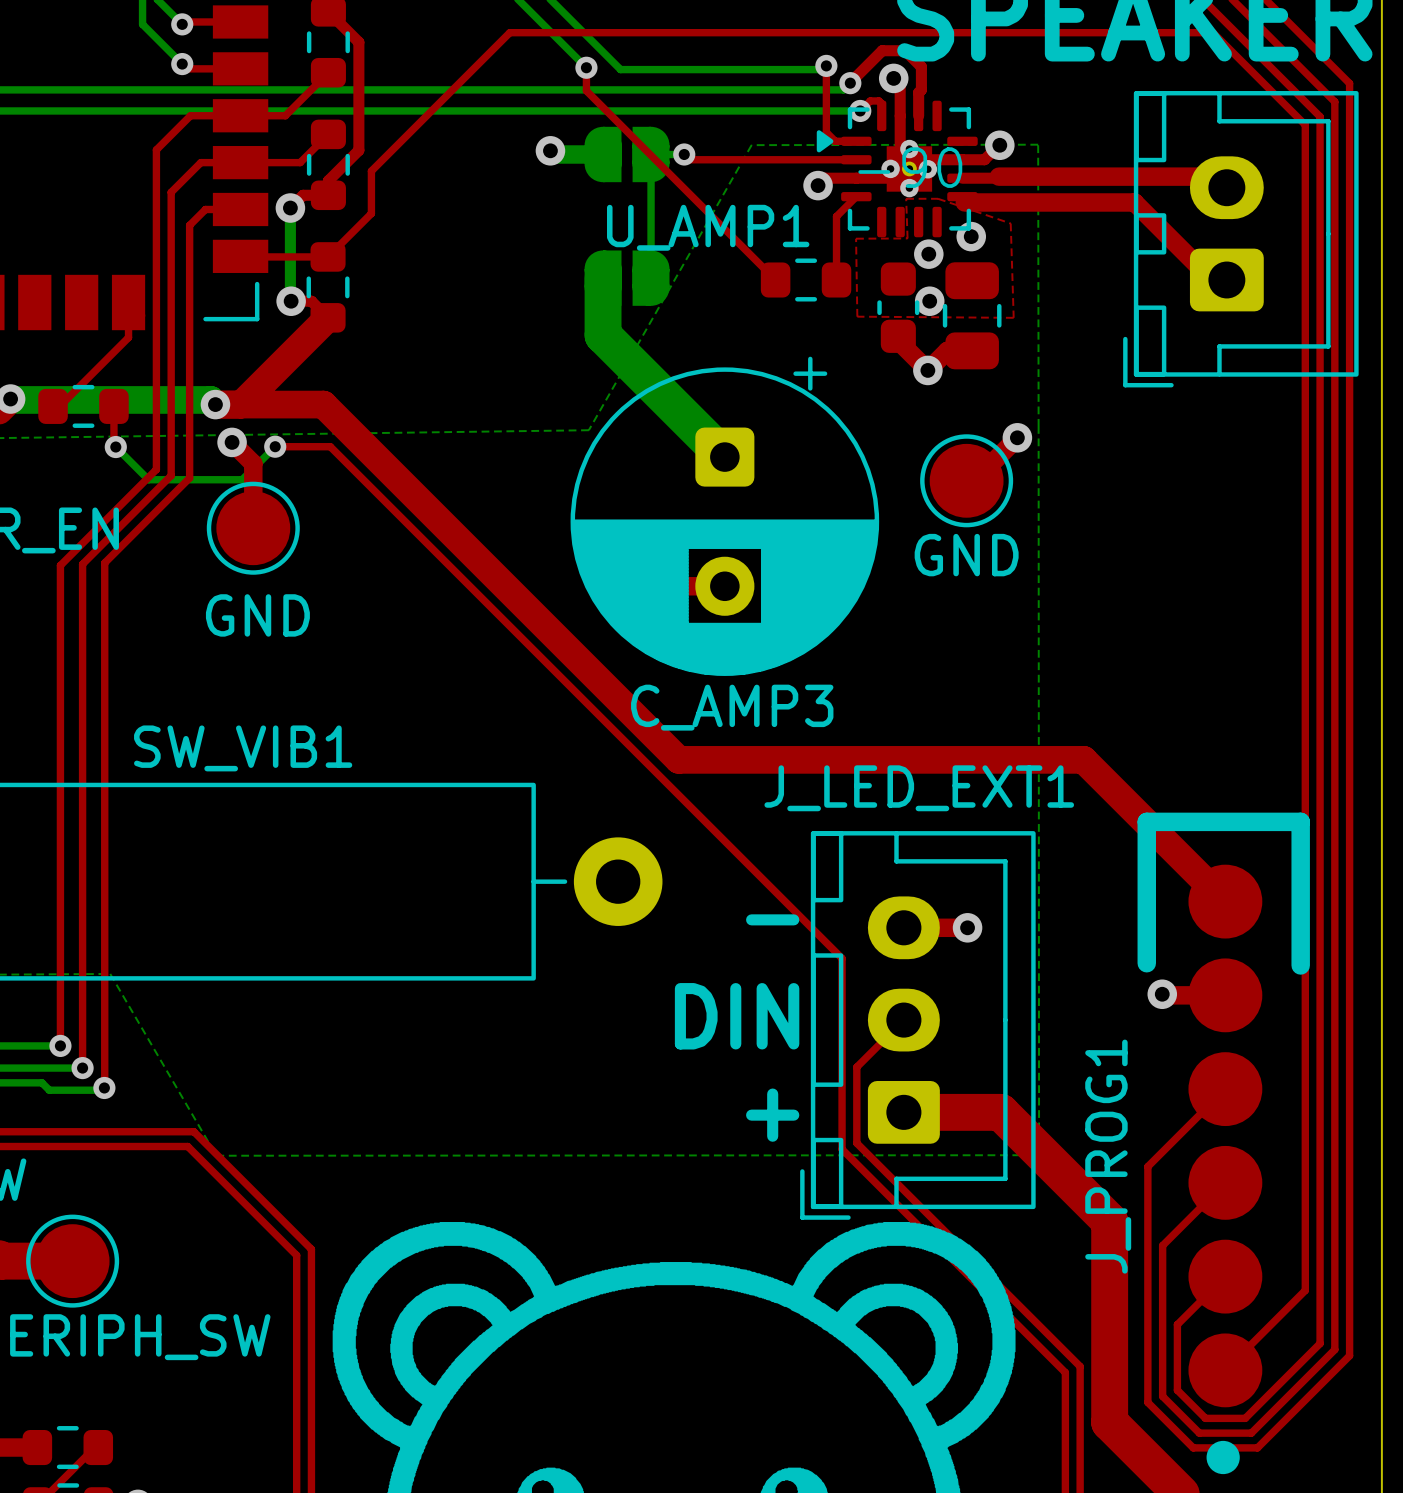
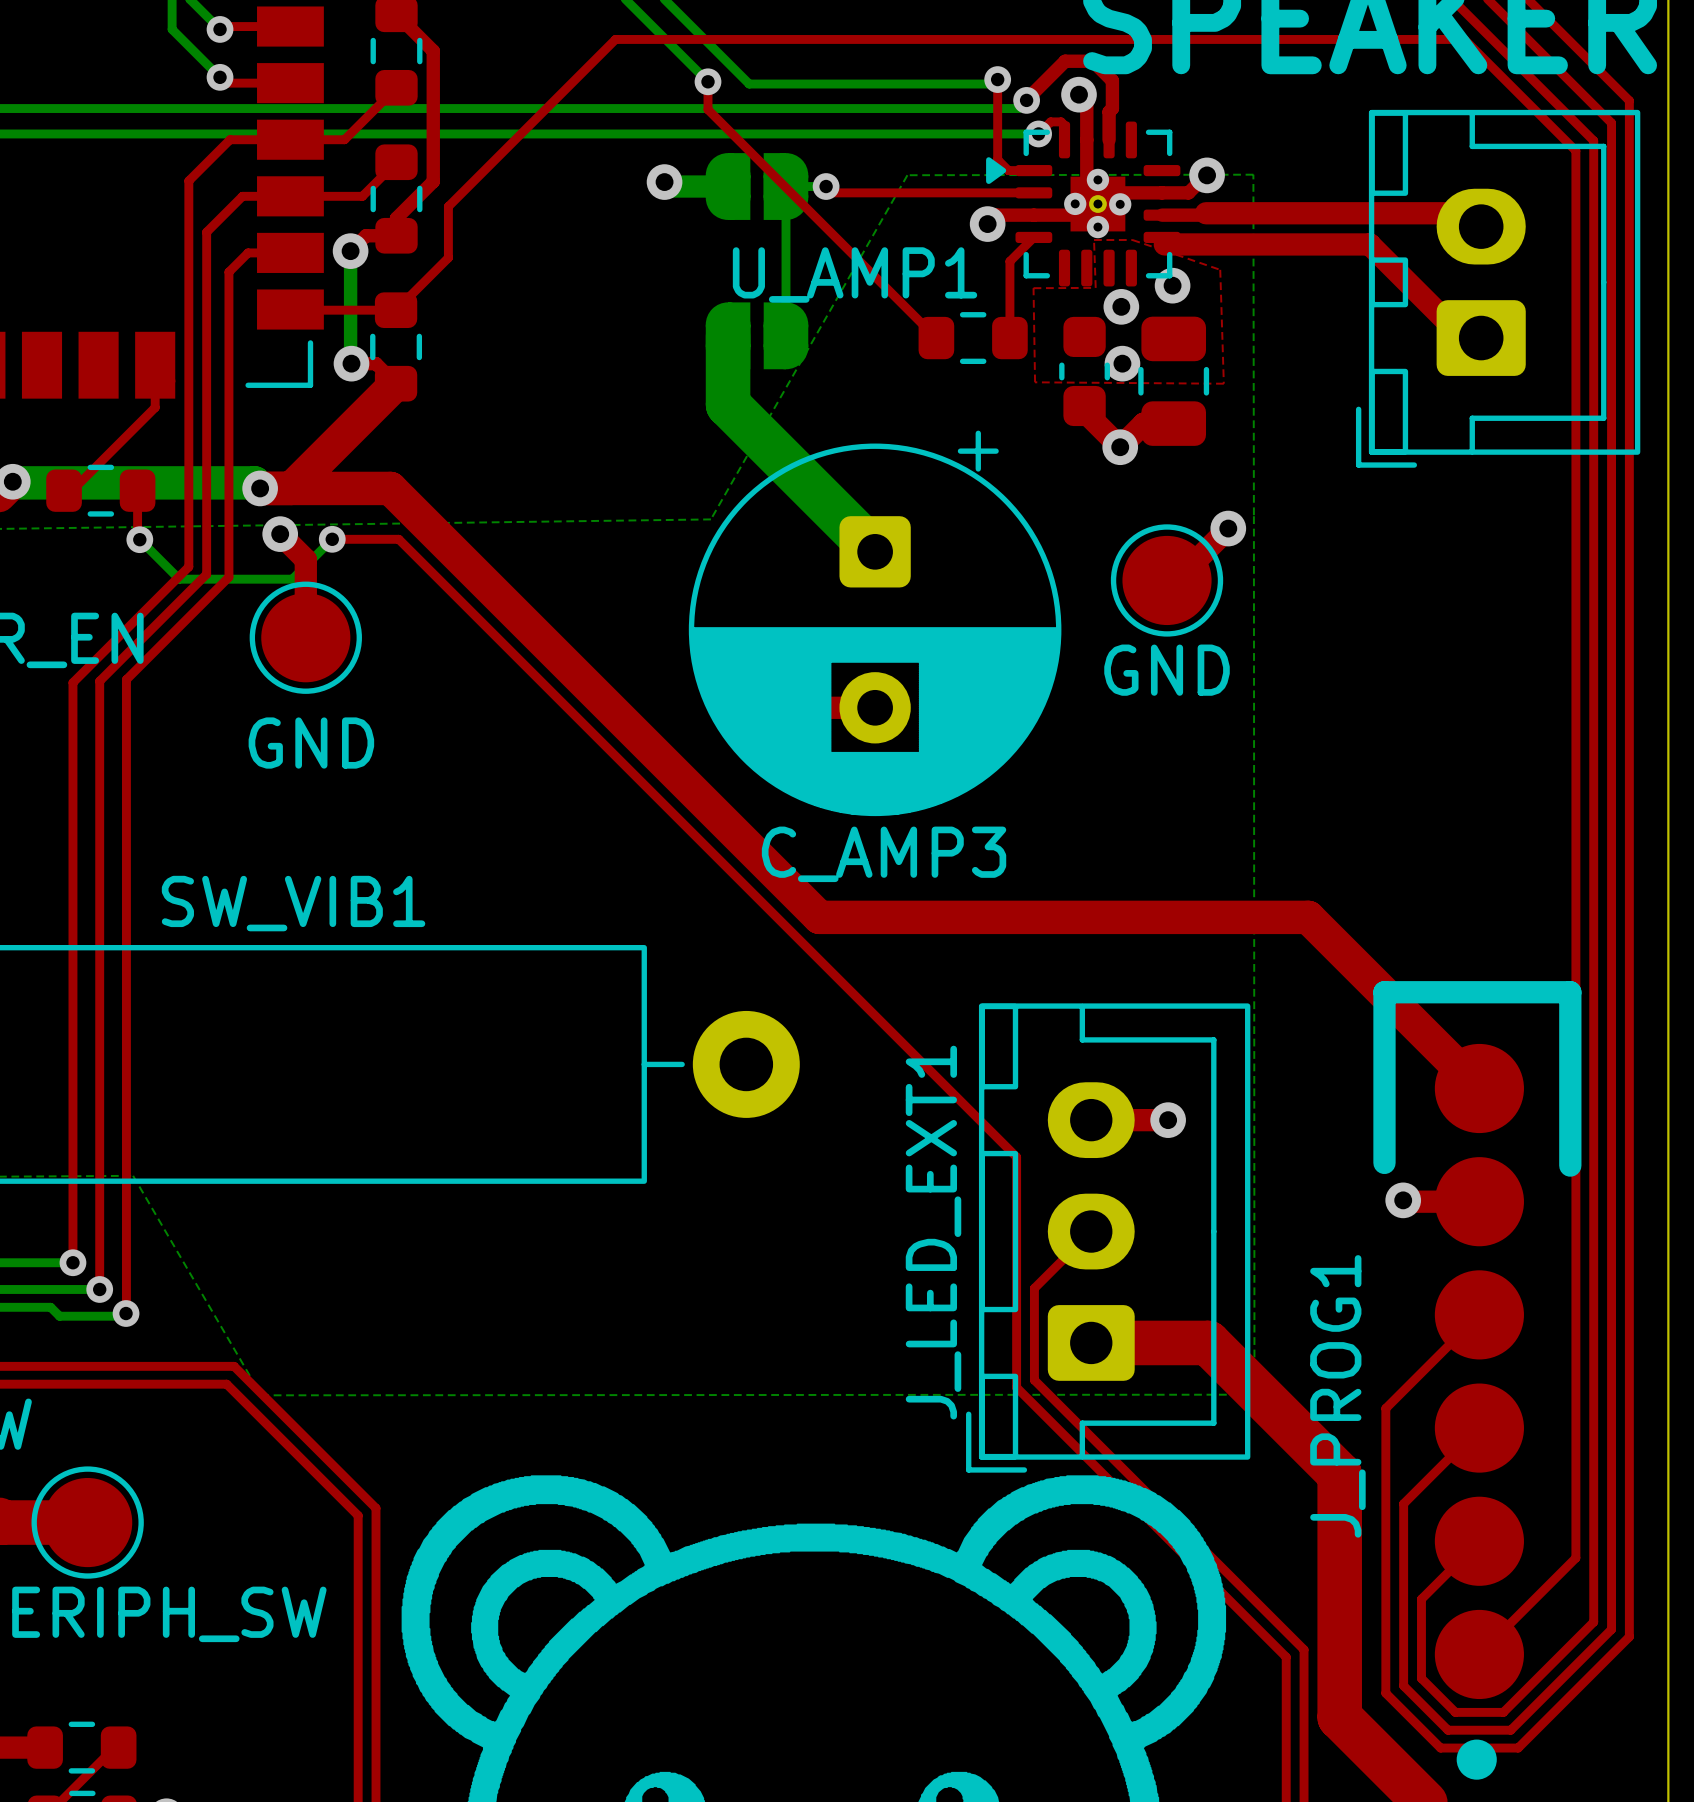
U_AMP1 text: -90 (910, 167) -> none
J_LED_EXT1 name rotation: 0° (919, 788) -> 90° counterclockwise (933, 1232)
text: - (772, 919) -> none
text: DIN (737, 1016) -> none
text: + (772, 1115) -> none

